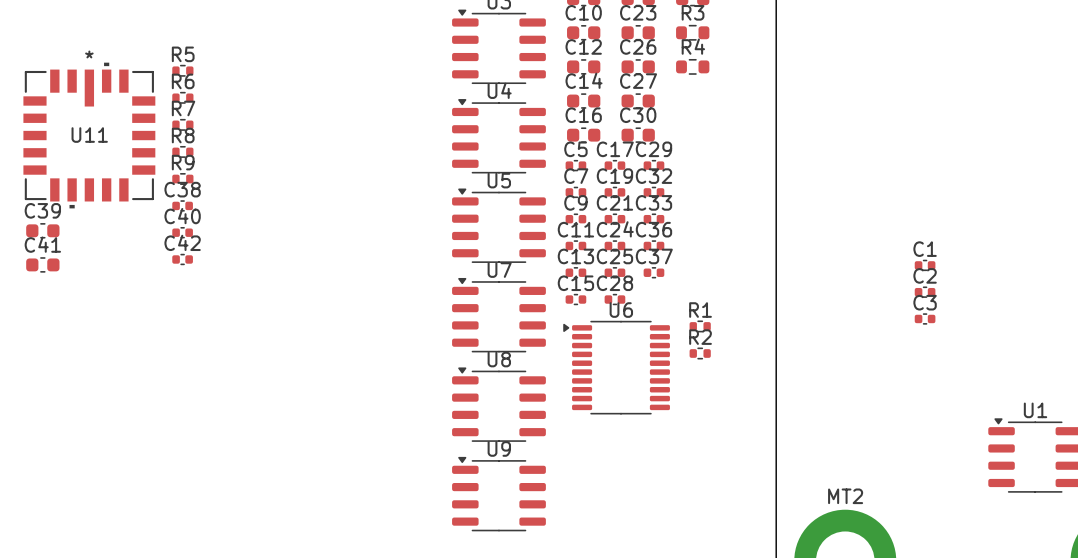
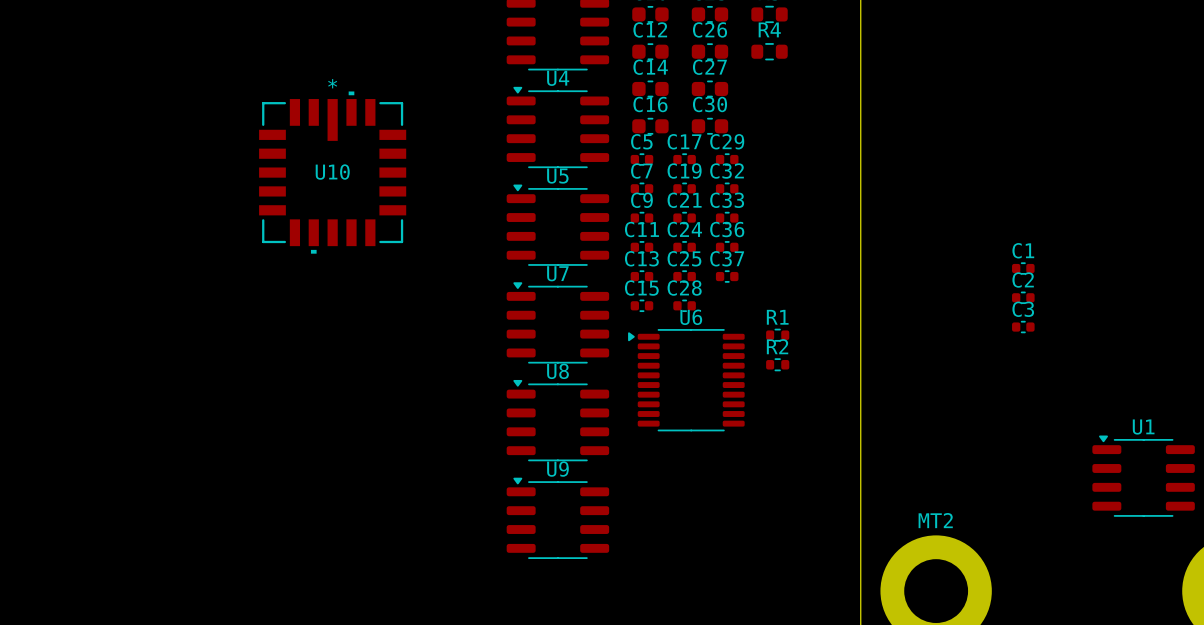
R5: (182, 70) -> none
R6: (182, 97) -> none
R7: (182, 124) -> none
U11: (89, 135) -> none
R8: (182, 151) -> none
U10: none -> (332, 172)
R9: (182, 179) -> none
C38: (182, 205) -> none
C39: (42, 230) -> none
C40: (182, 232) -> none
C42: (182, 259) -> none
C41: (42, 264) -> none

